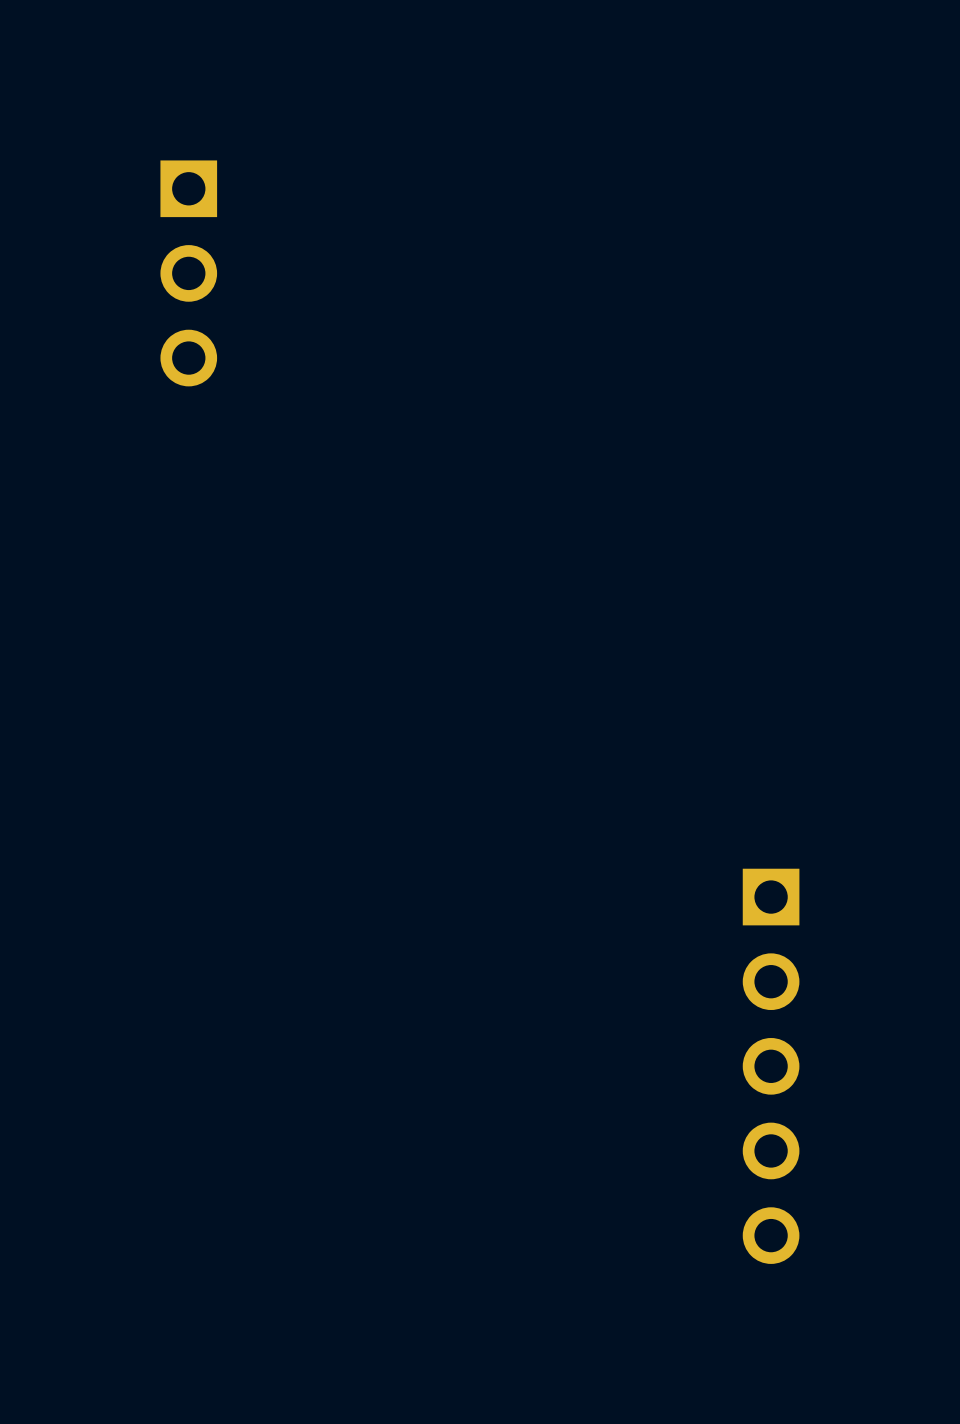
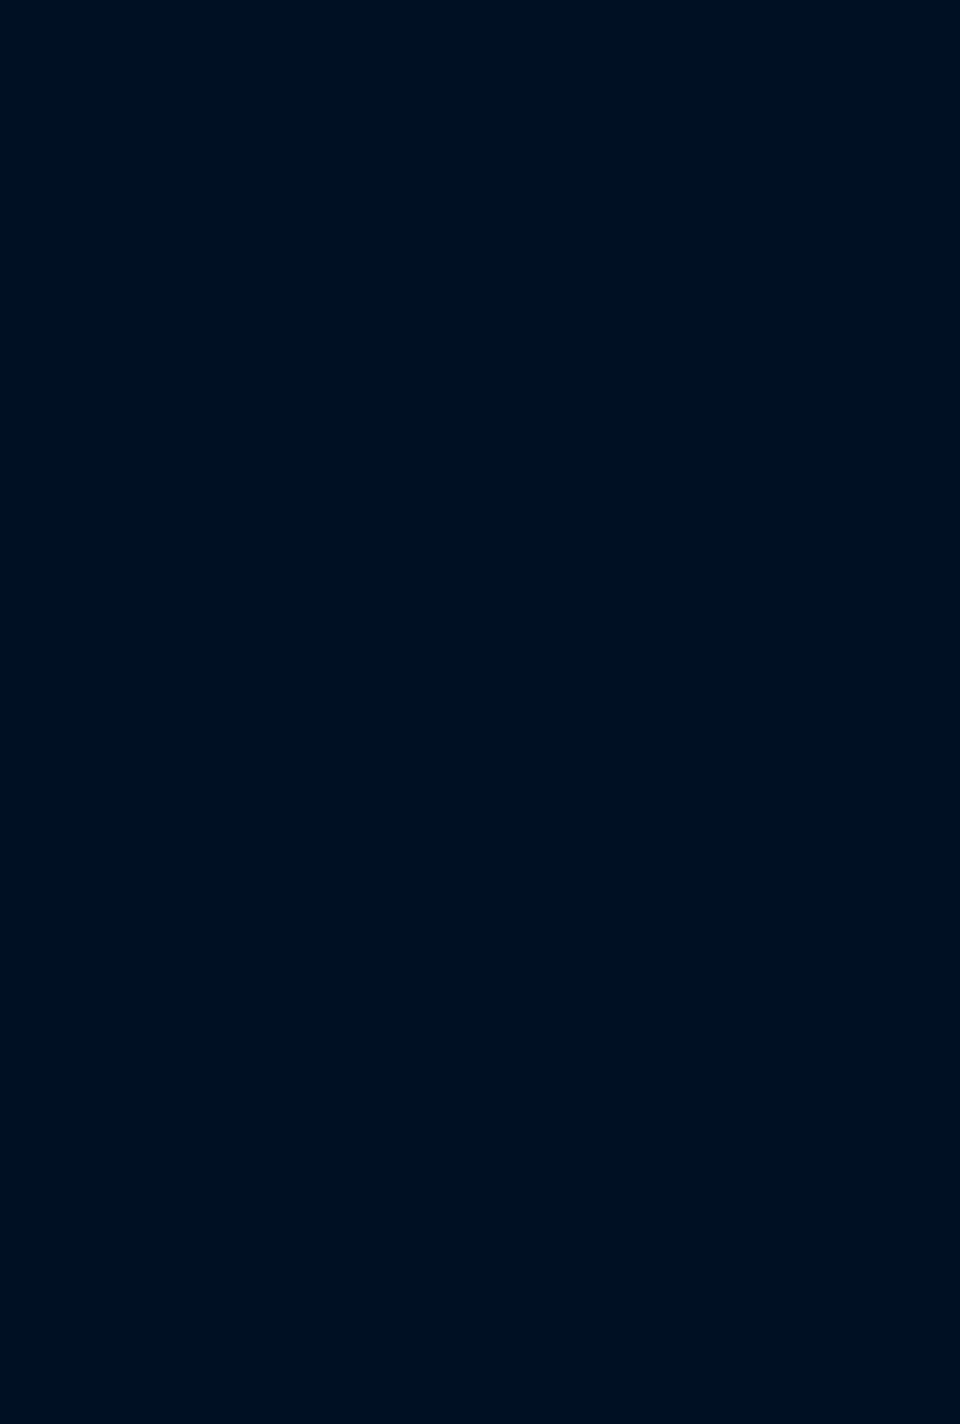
part: (188, 273) -> none
part: (771, 1066) -> none

